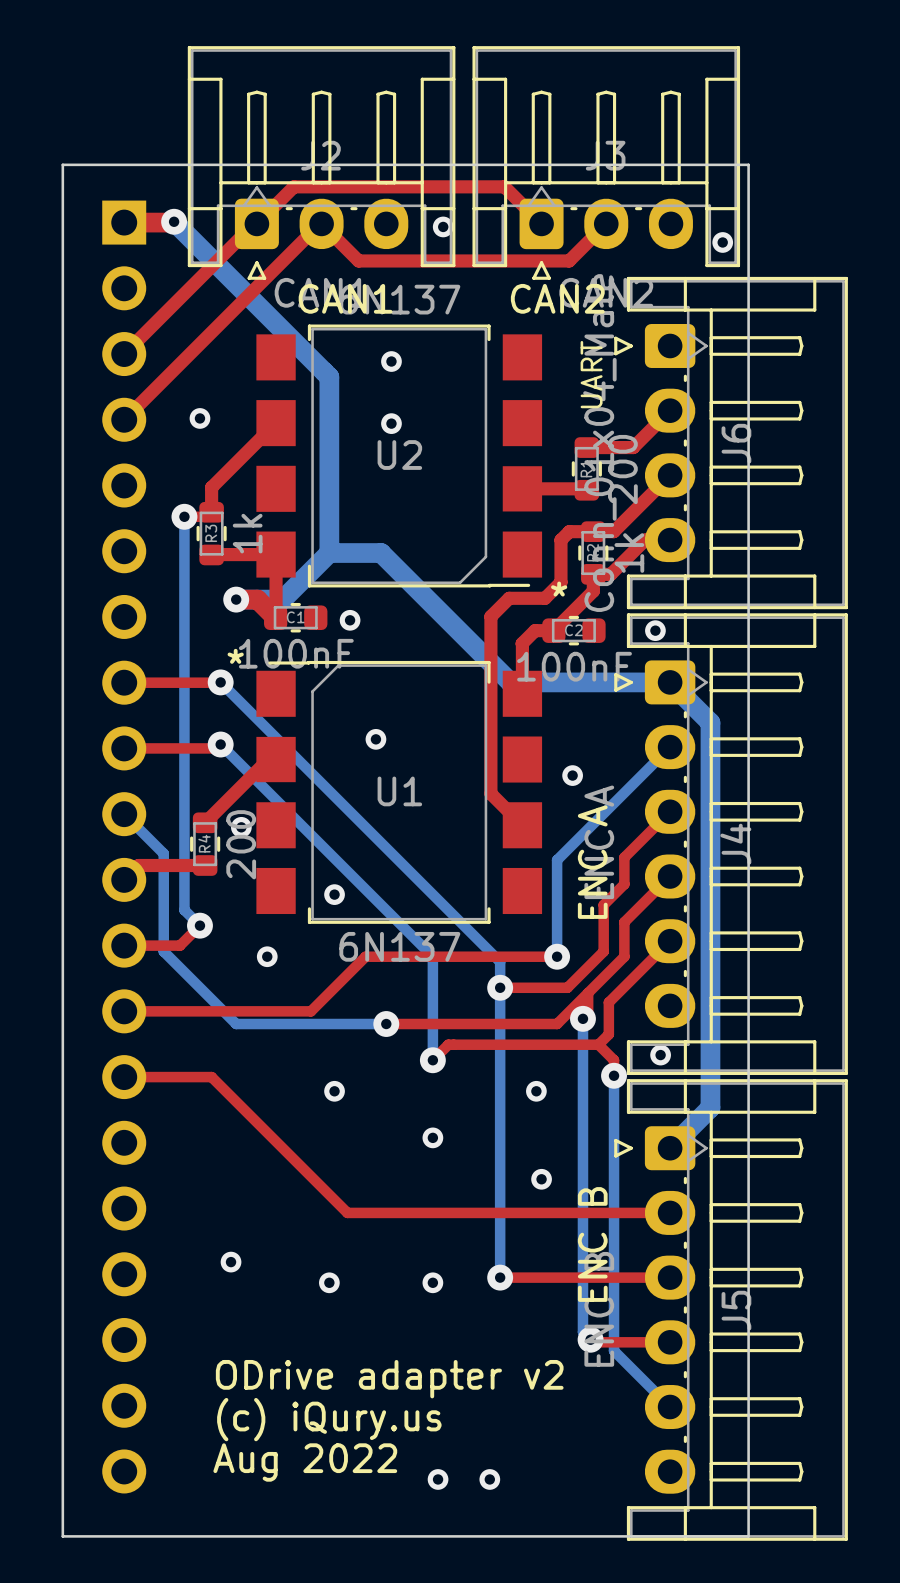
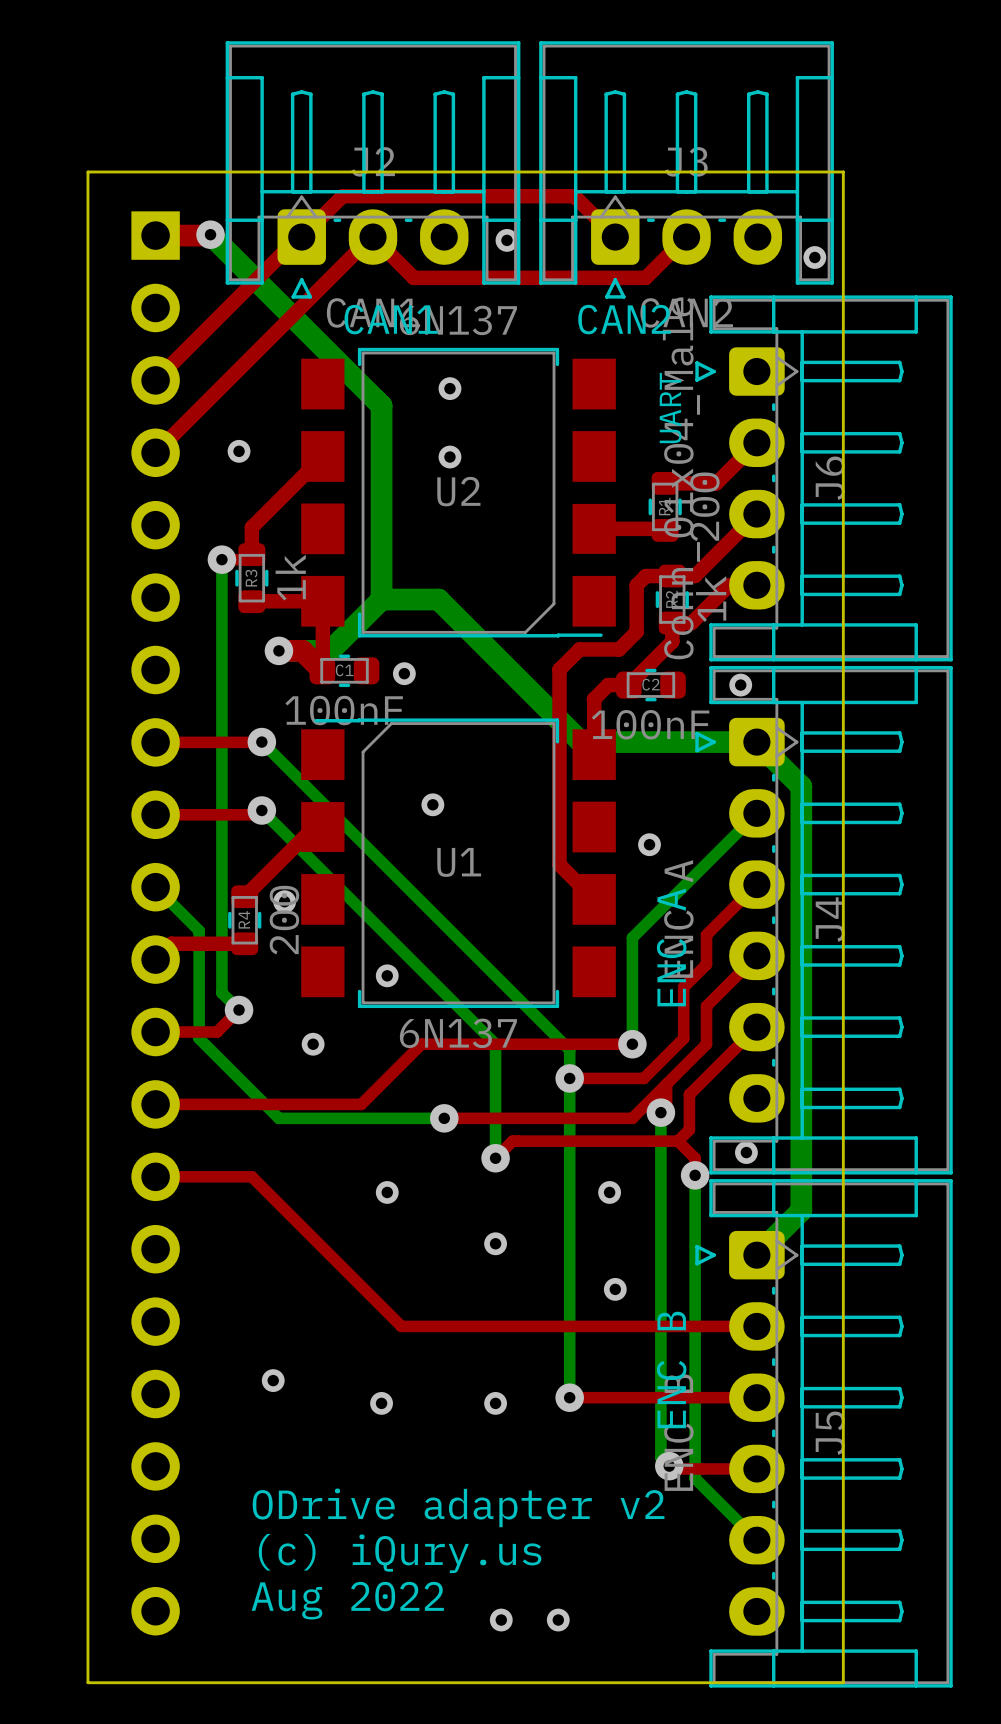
text: * (559, 589) -> none
text: * (235, 656) -> none

